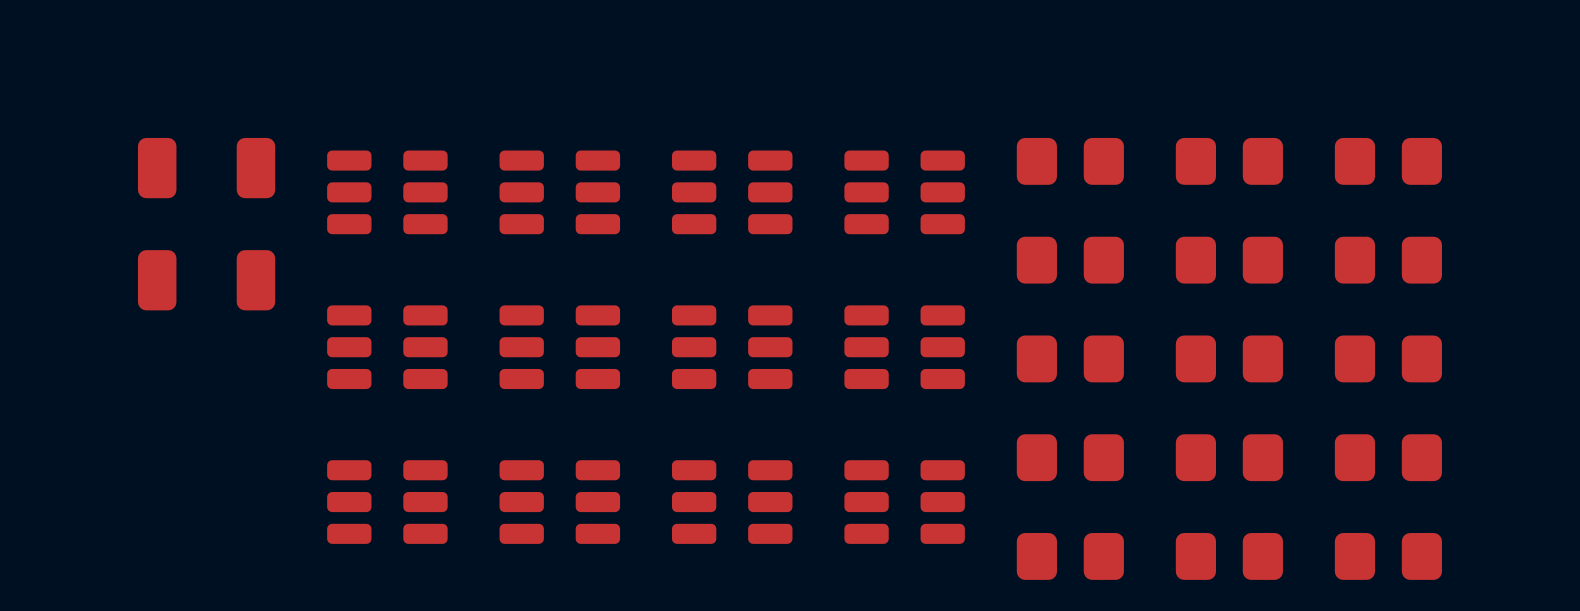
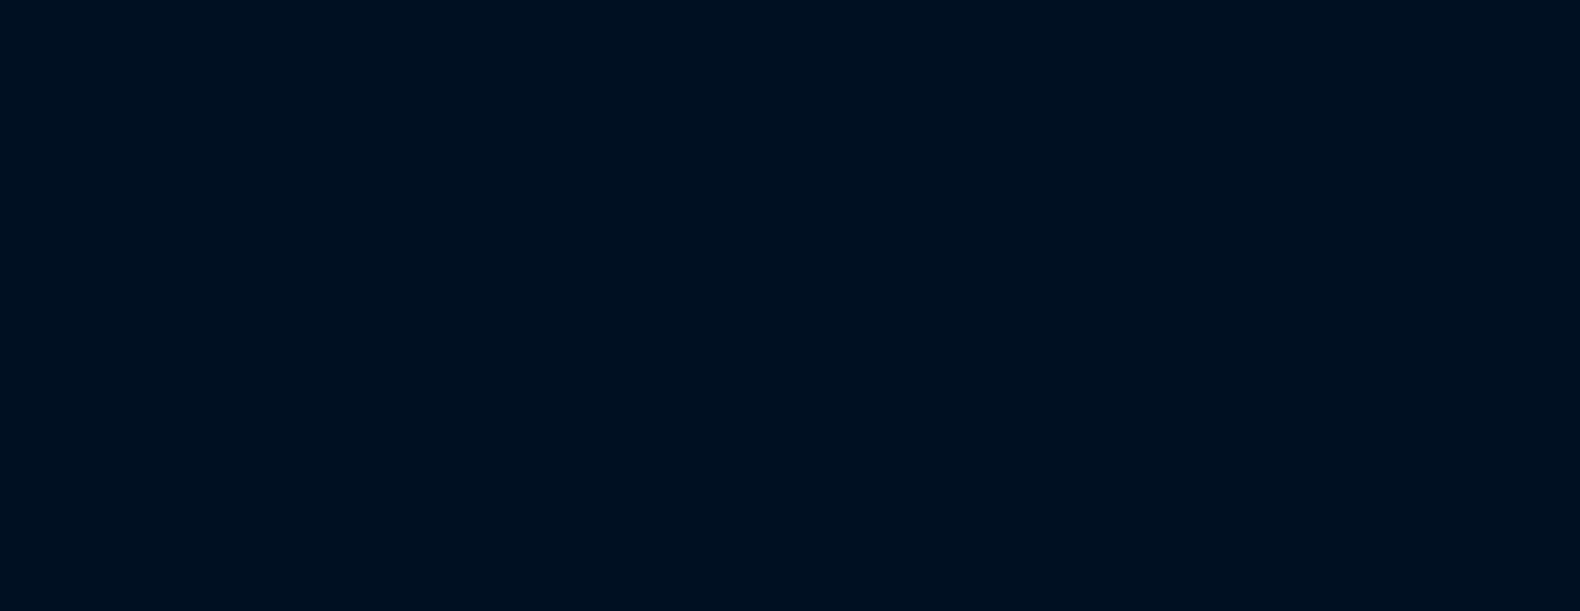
part: (1070, 161) -> none
part: (1229, 161) -> none
part: (1388, 161) -> none
part: (206, 168) -> none
part: (387, 192) -> none
part: (559, 192) -> none
part: (732, 192) -> none
part: (904, 192) -> none
part: (1070, 260) -> none
part: (1229, 260) -> none
part: (1388, 260) -> none
part: (206, 280) -> none
part: (387, 347) -> none
part: (559, 347) -> none
part: (732, 347) -> none
part: (904, 347) -> none
part: (1070, 358) -> none
part: (1229, 358) -> none
part: (1388, 358) -> none
part: (1070, 457) -> none
part: (1229, 457) -> none
part: (1388, 457) -> none
part: (387, 502) -> none
part: (559, 502) -> none
part: (732, 502) -> none
part: (904, 502) -> none
part: (1070, 556) -> none
part: (1229, 556) -> none
part: (1388, 556) -> none

